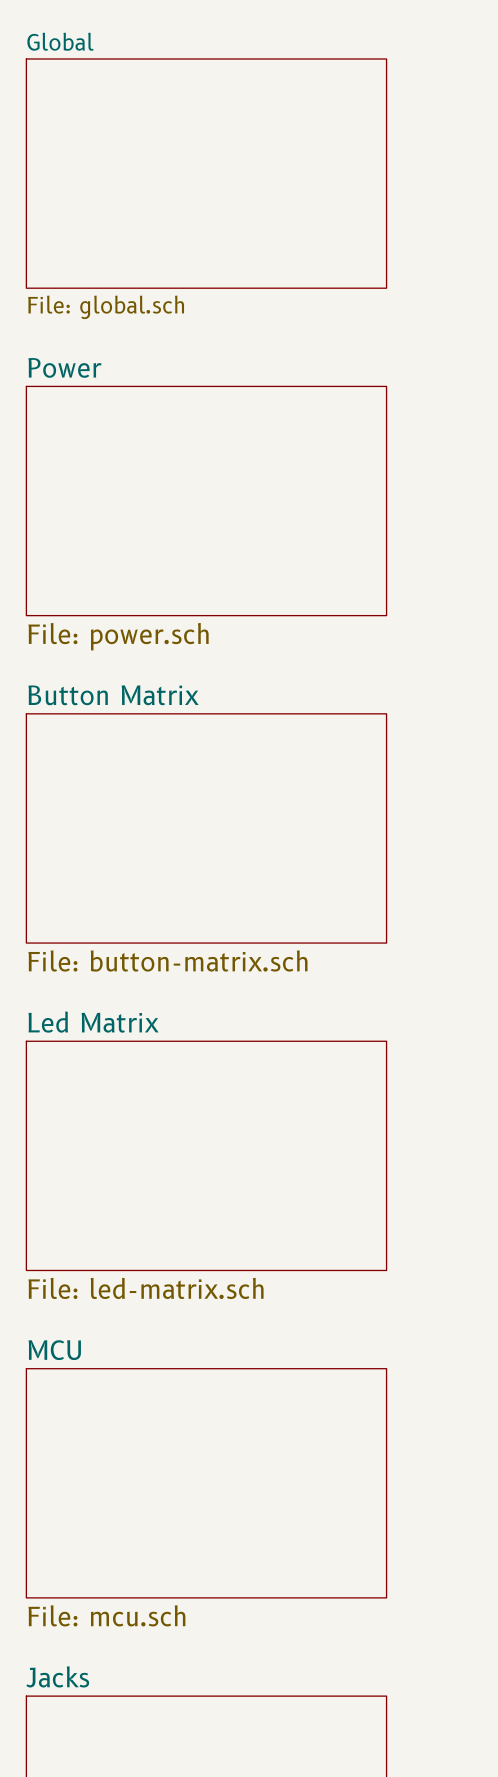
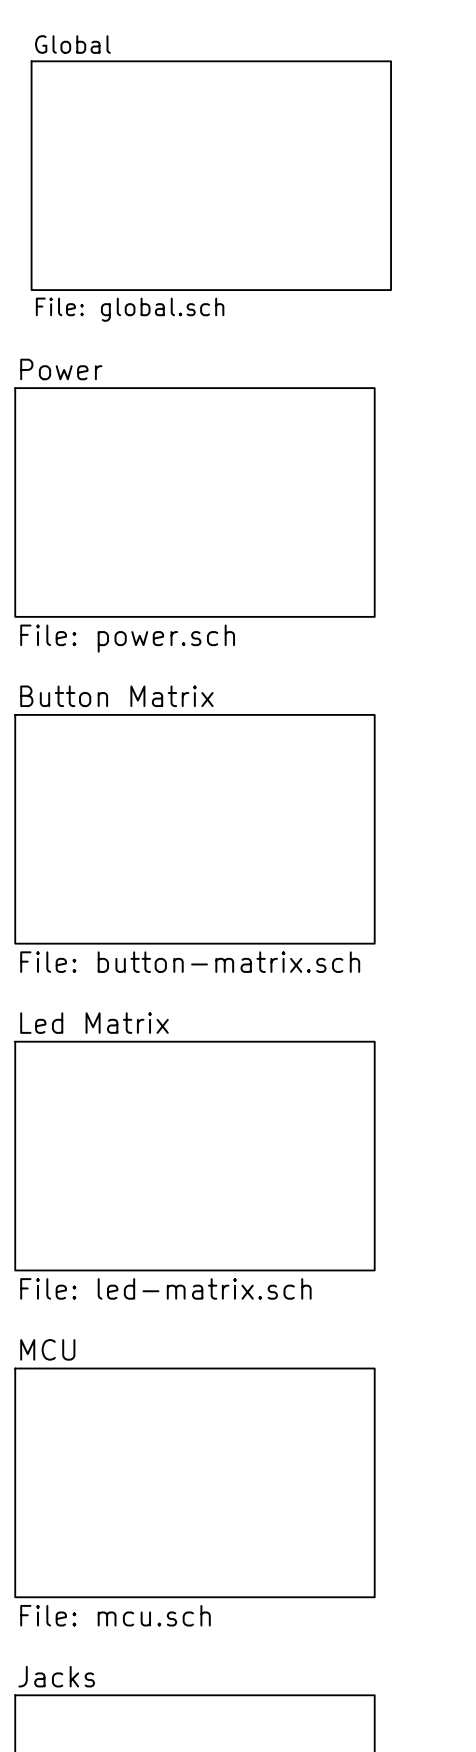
sheet Global position: (206, 173) -> (211, 175)

